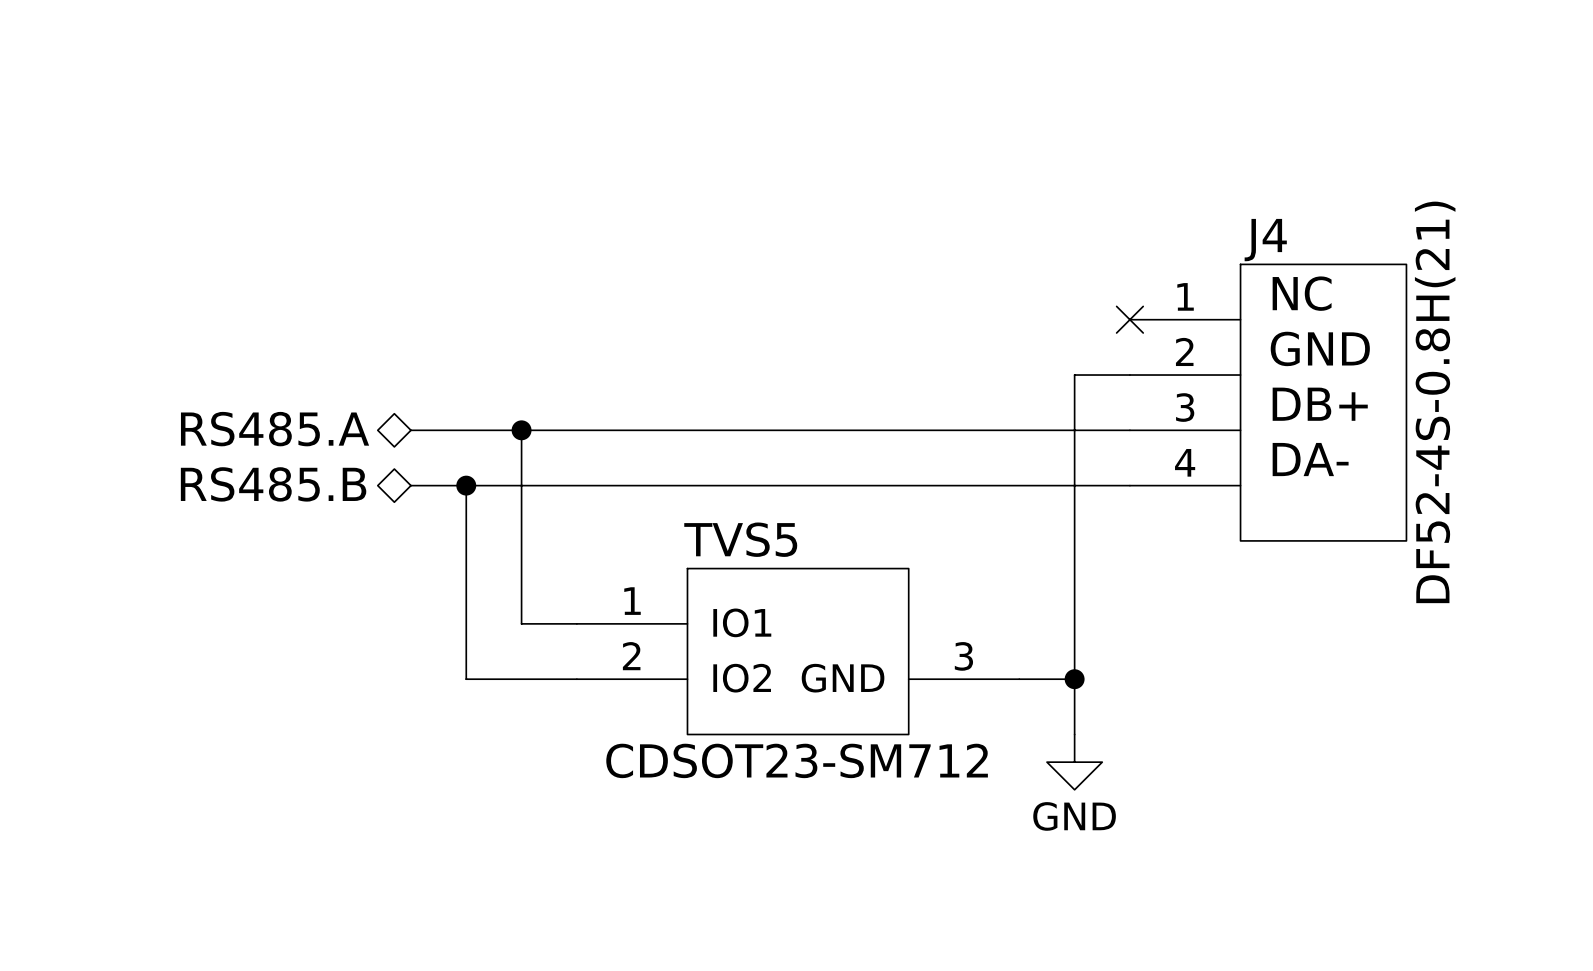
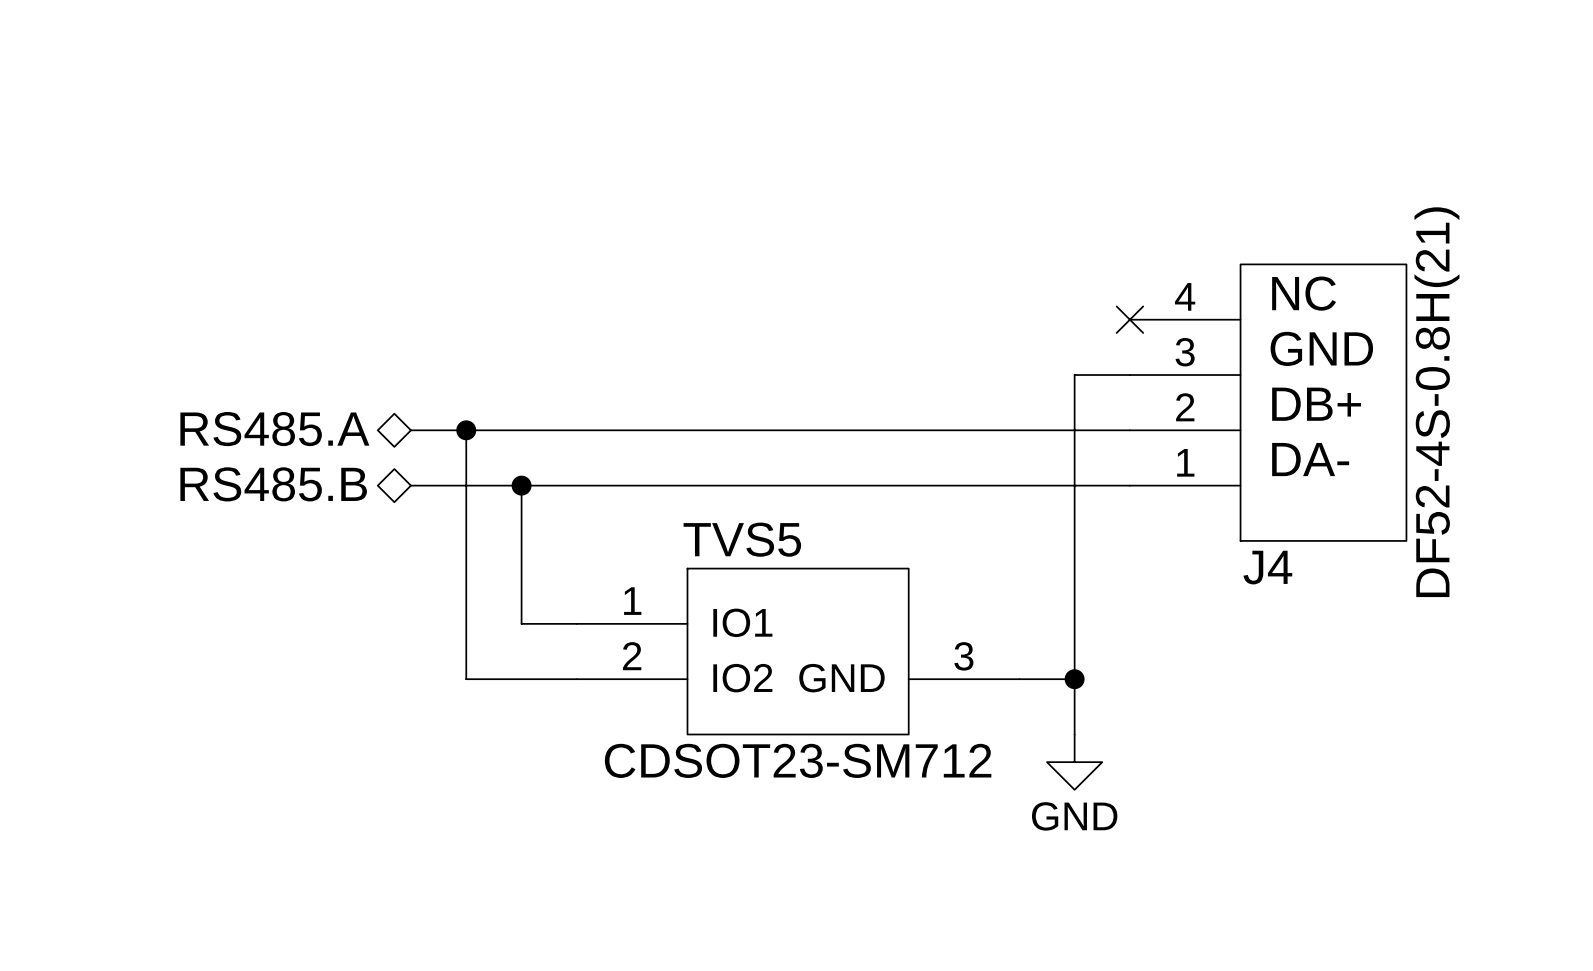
J4 flip: as is (1323, 402) -> up-down (1323, 402)
junction: none -> (466, 430)
wire: (521, 430) (521, 485) -> (466, 430) (466, 485)
junction: (521, 430) -> none
junction: (466, 485) -> none
junction: none -> (521, 485)

